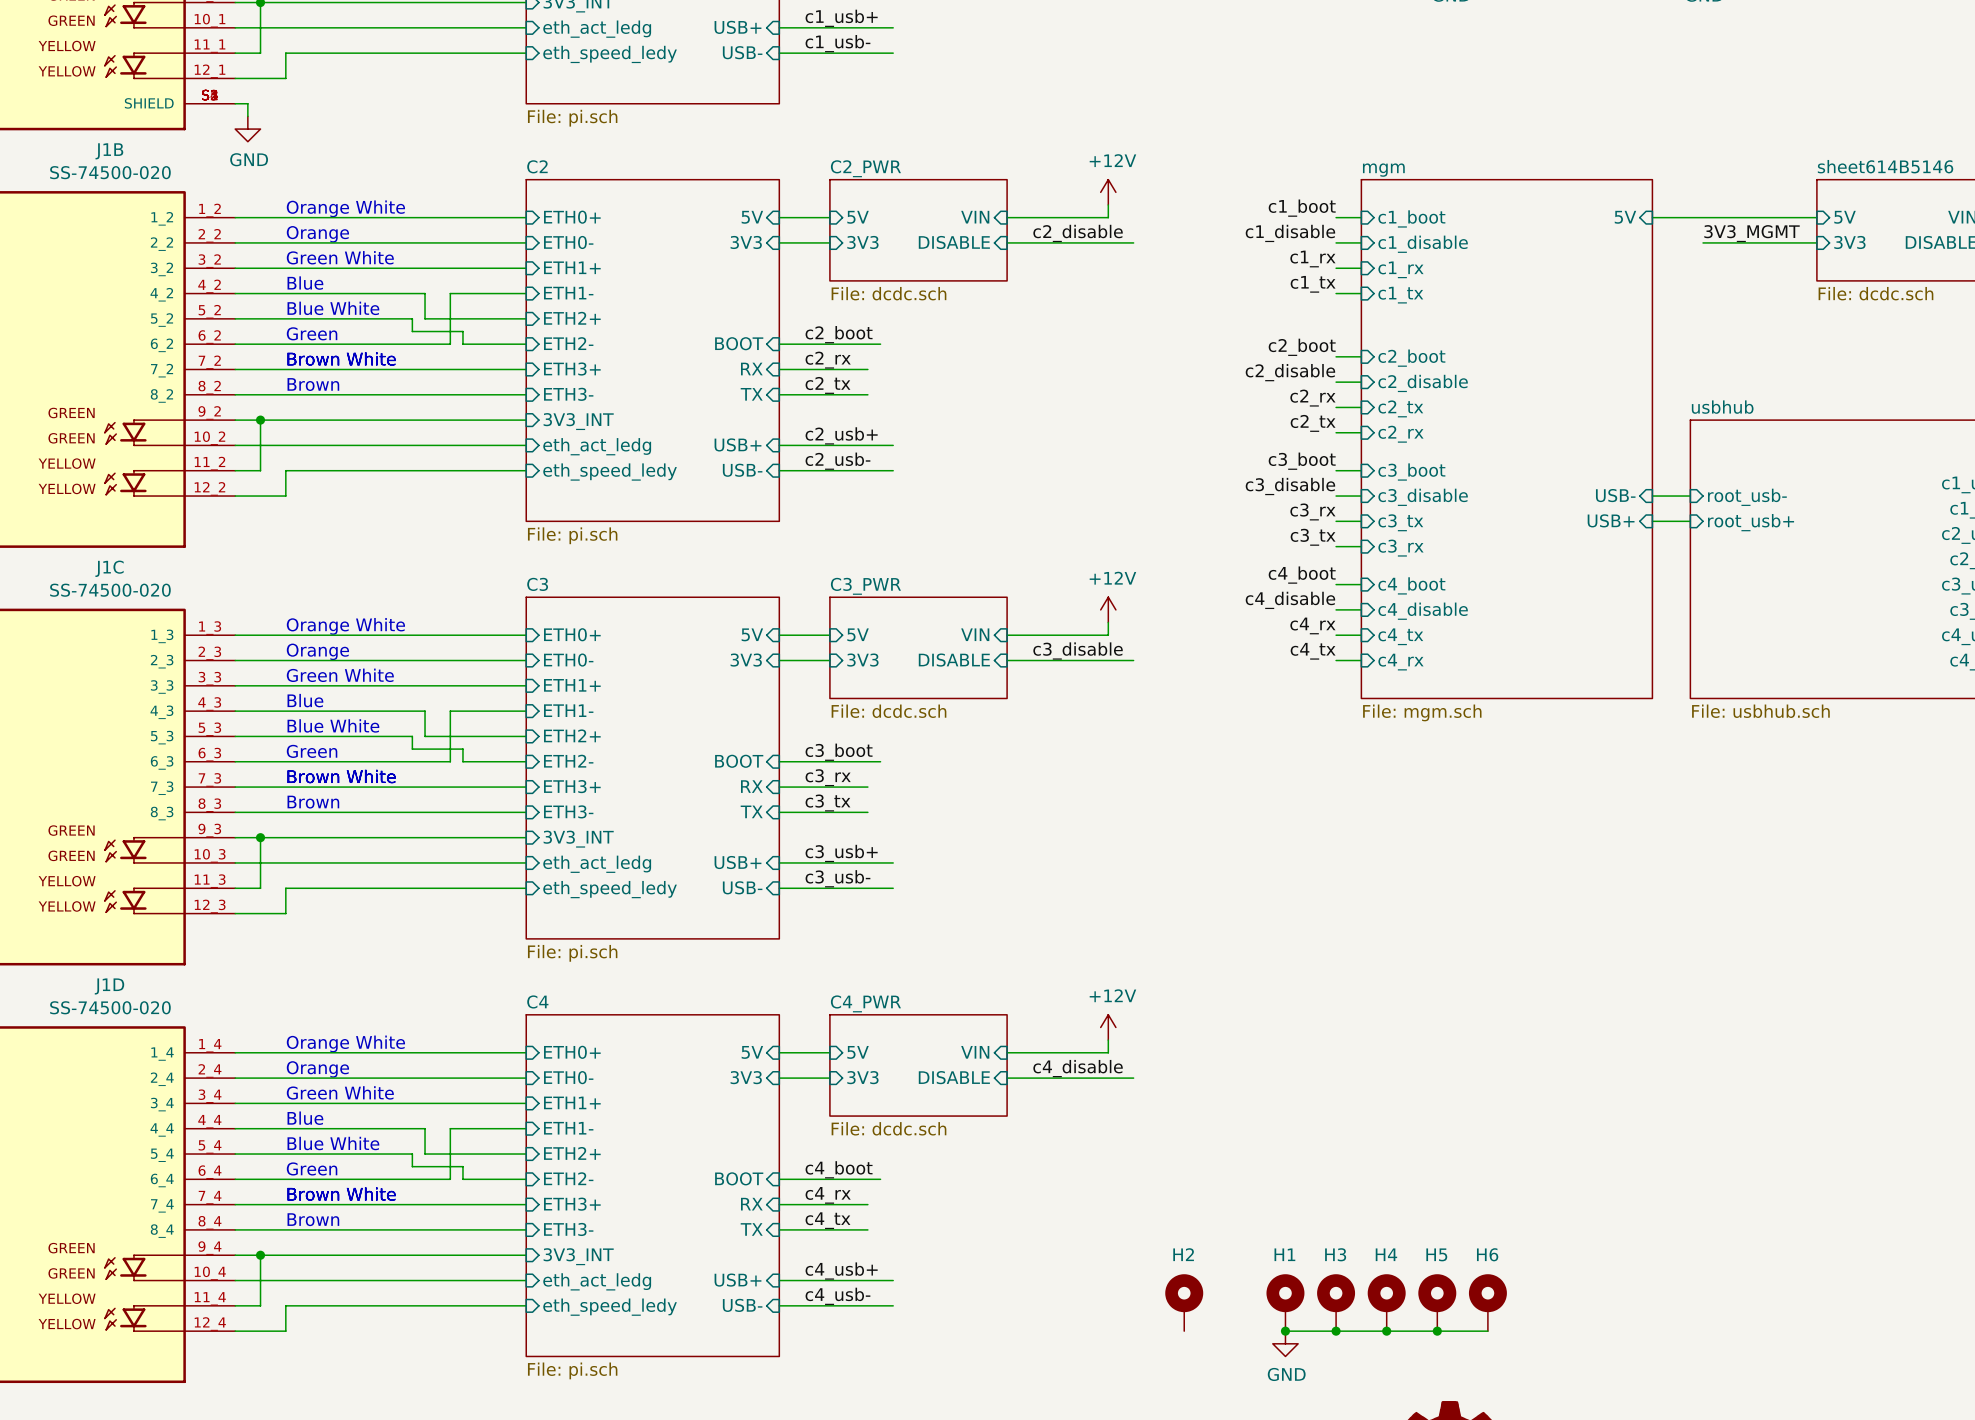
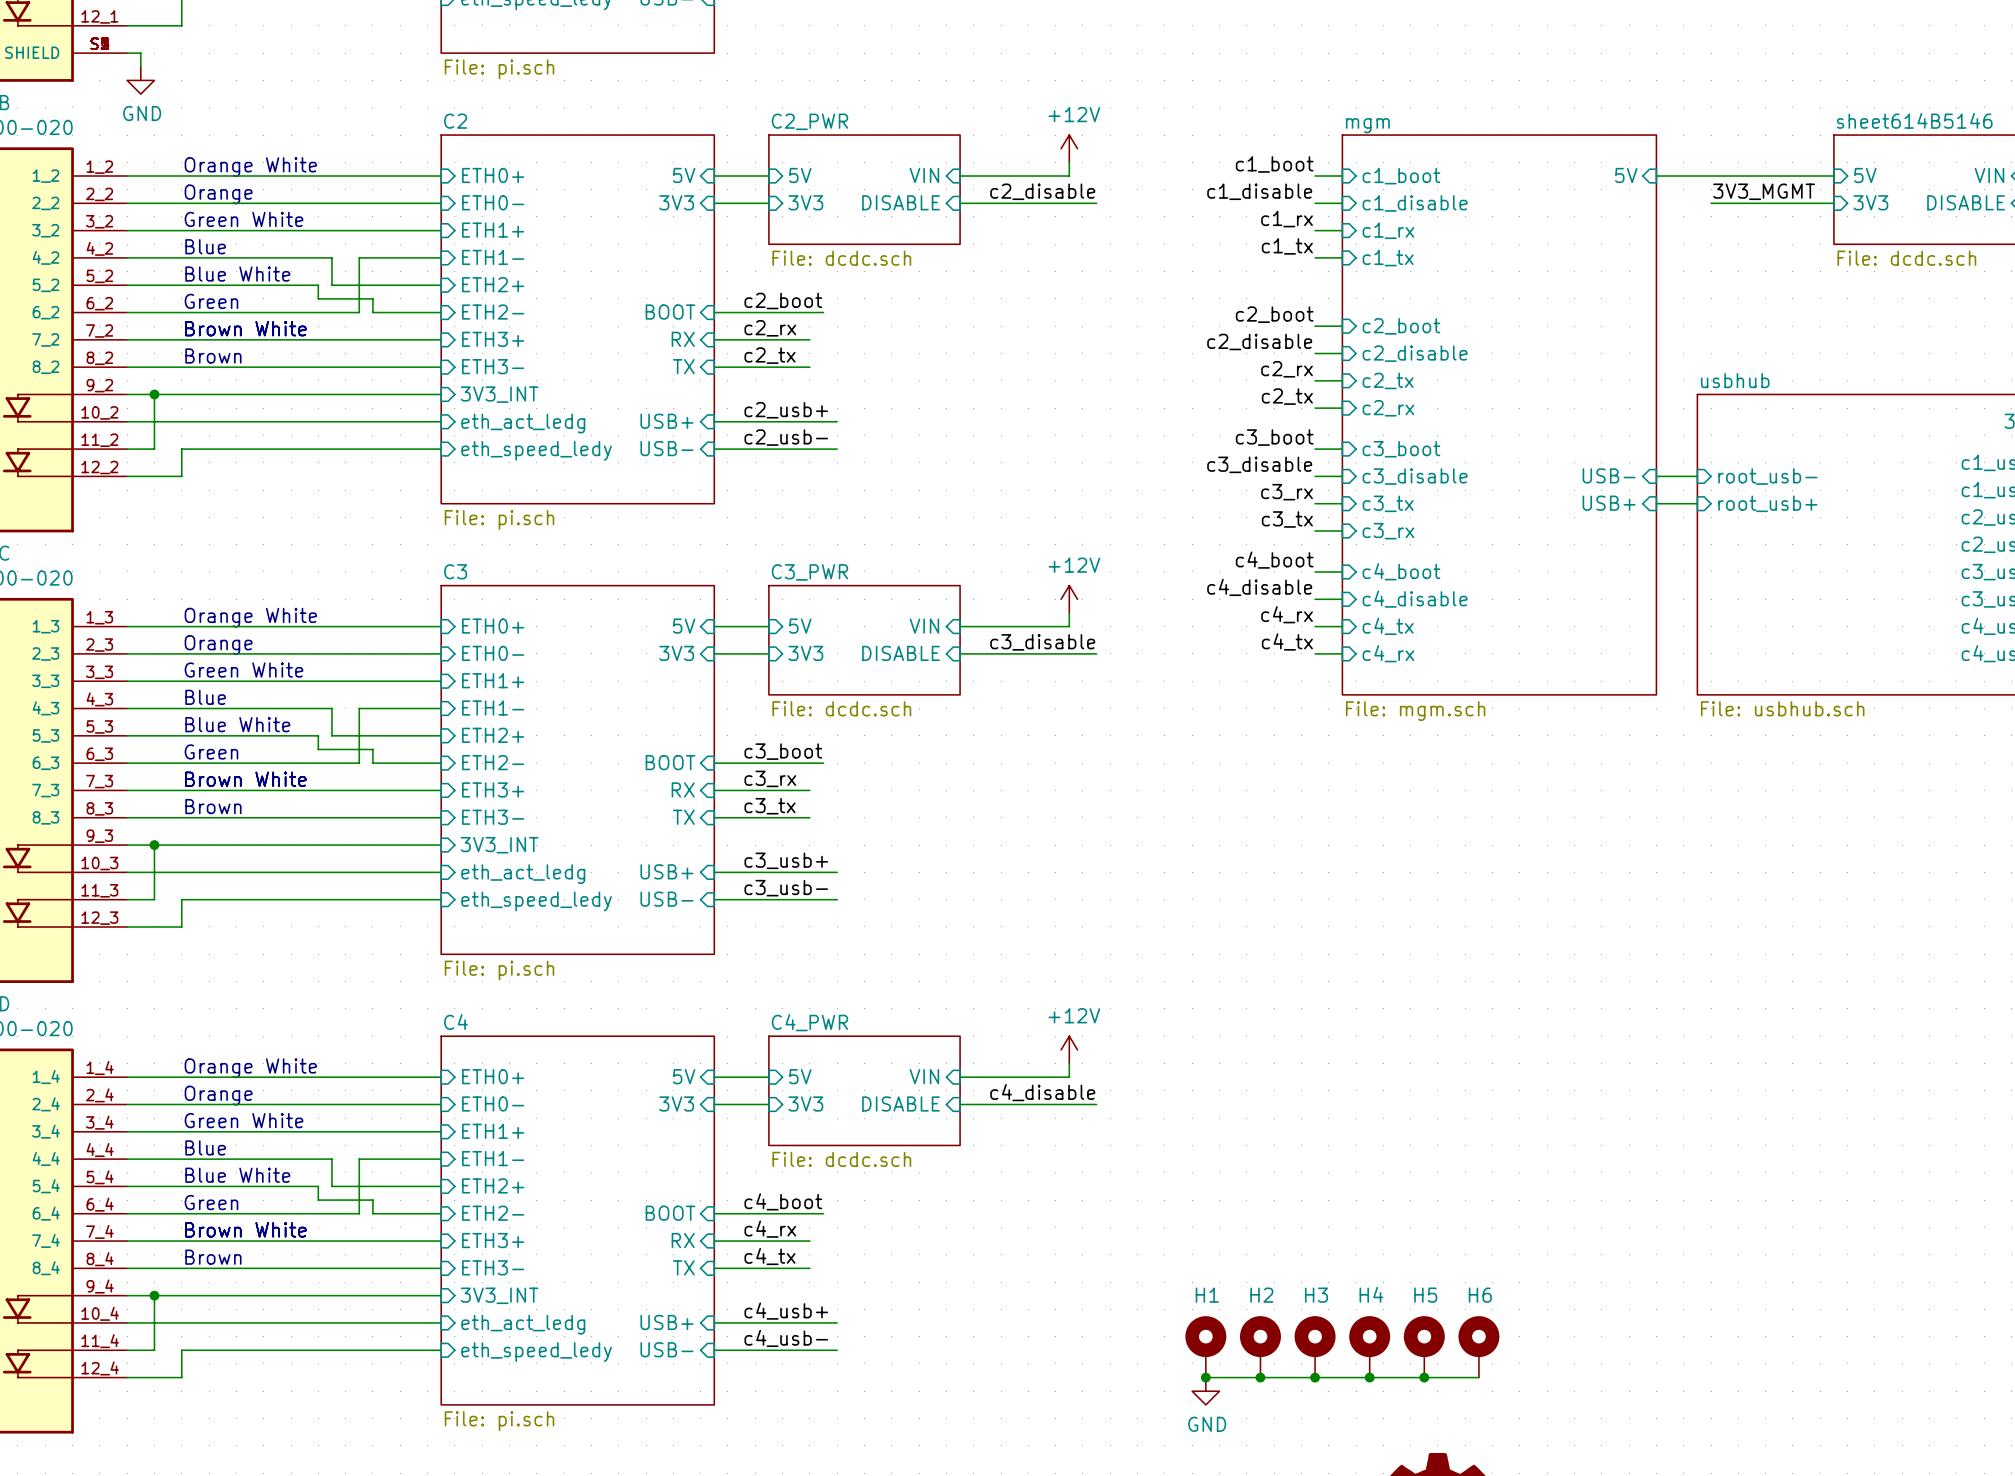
H1 name: H1 (1284, 1254) -> H2 (1261, 1295)
H2: (1184, 1302) -> none
H1: none -> (1205, 1346)
wire: none -> (1205, 1377) (1260, 1377)
junction: none -> (1205, 1377)
power symbol position: GND (1285, 1343) -> GND (1205, 1391)

